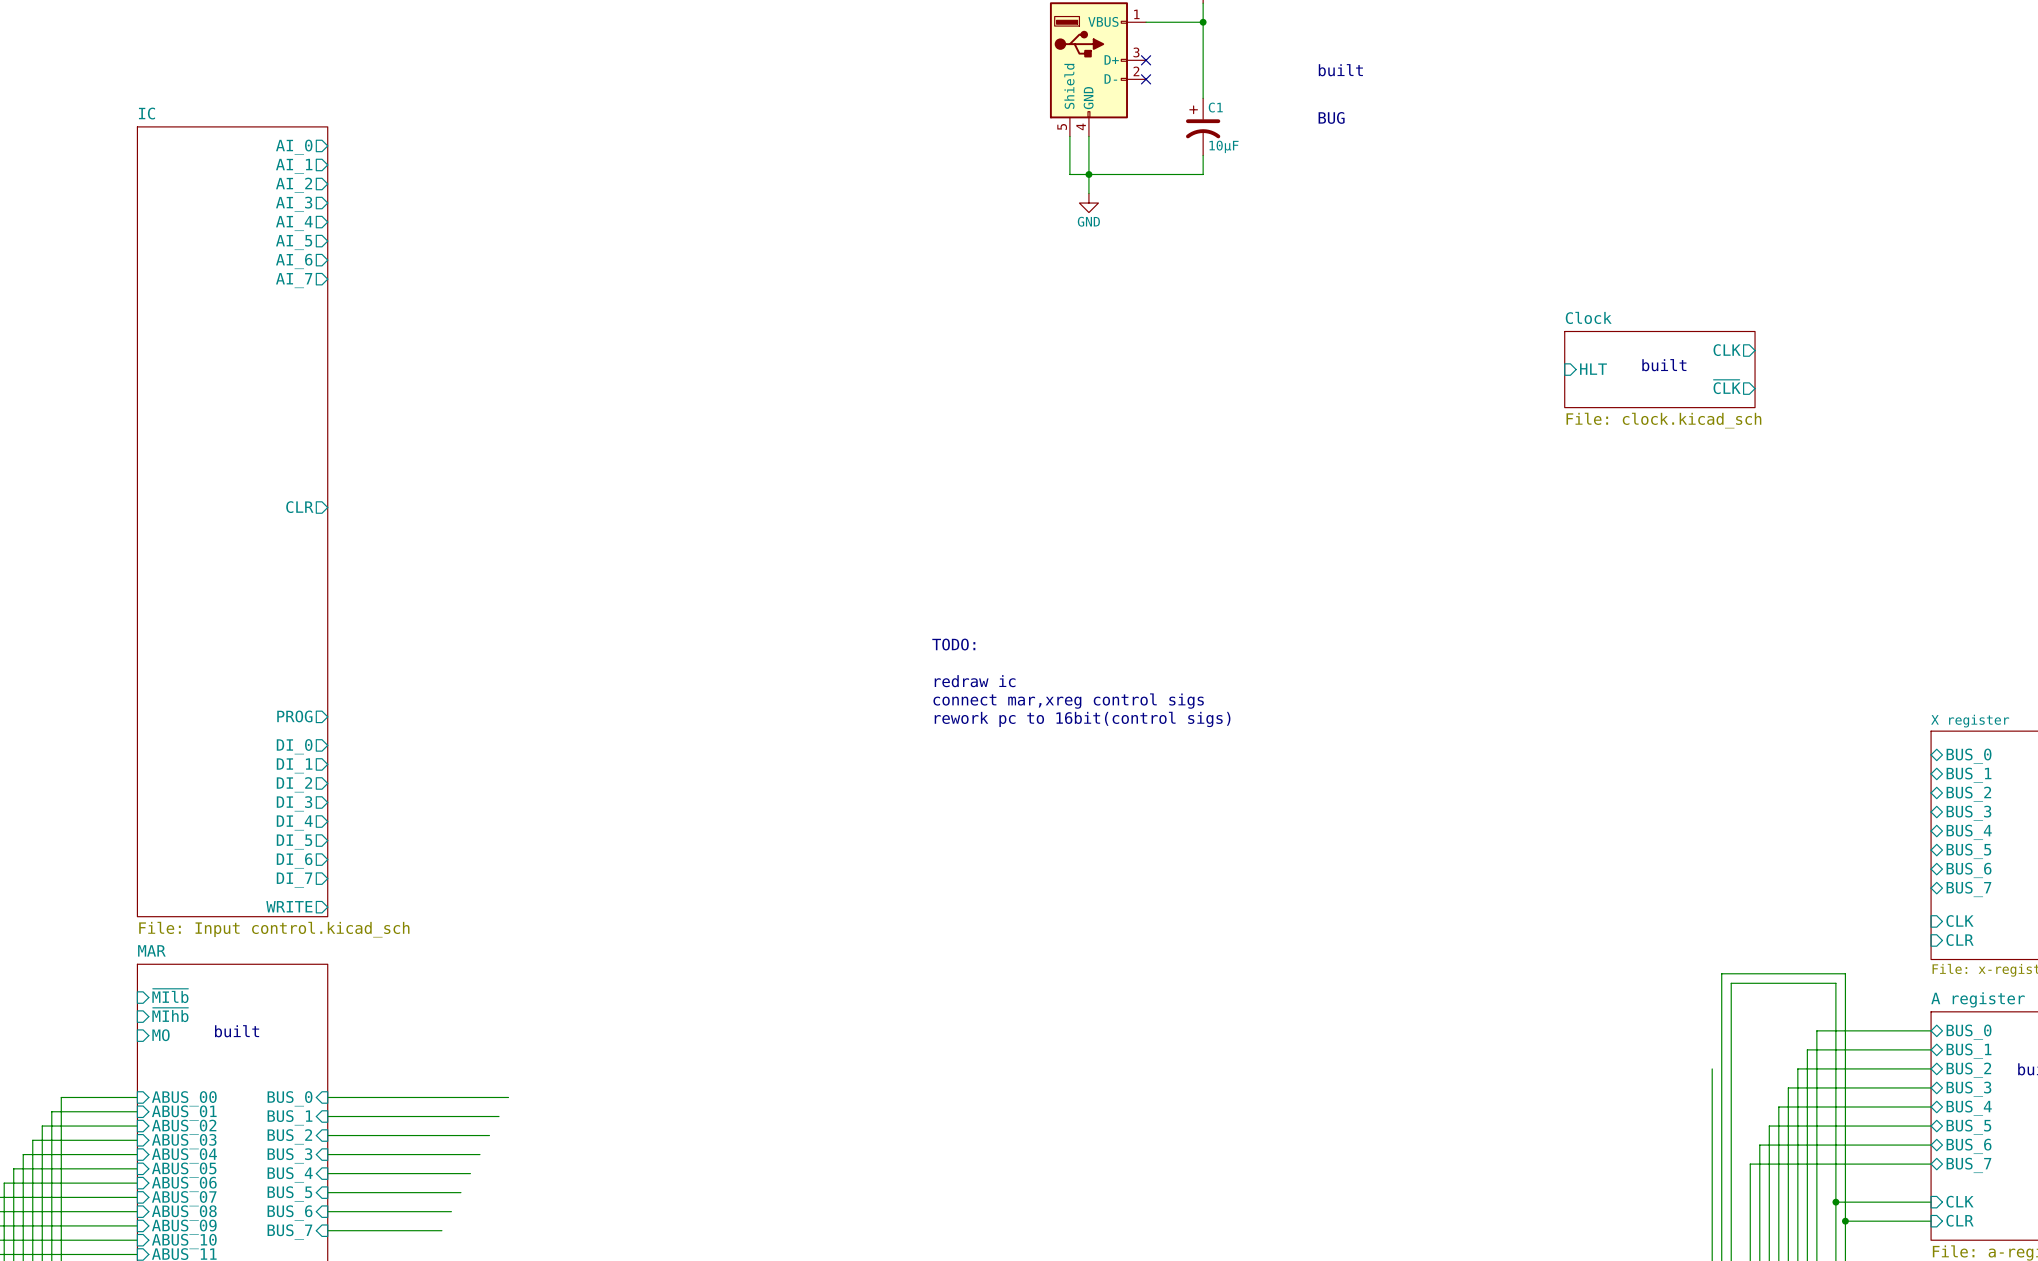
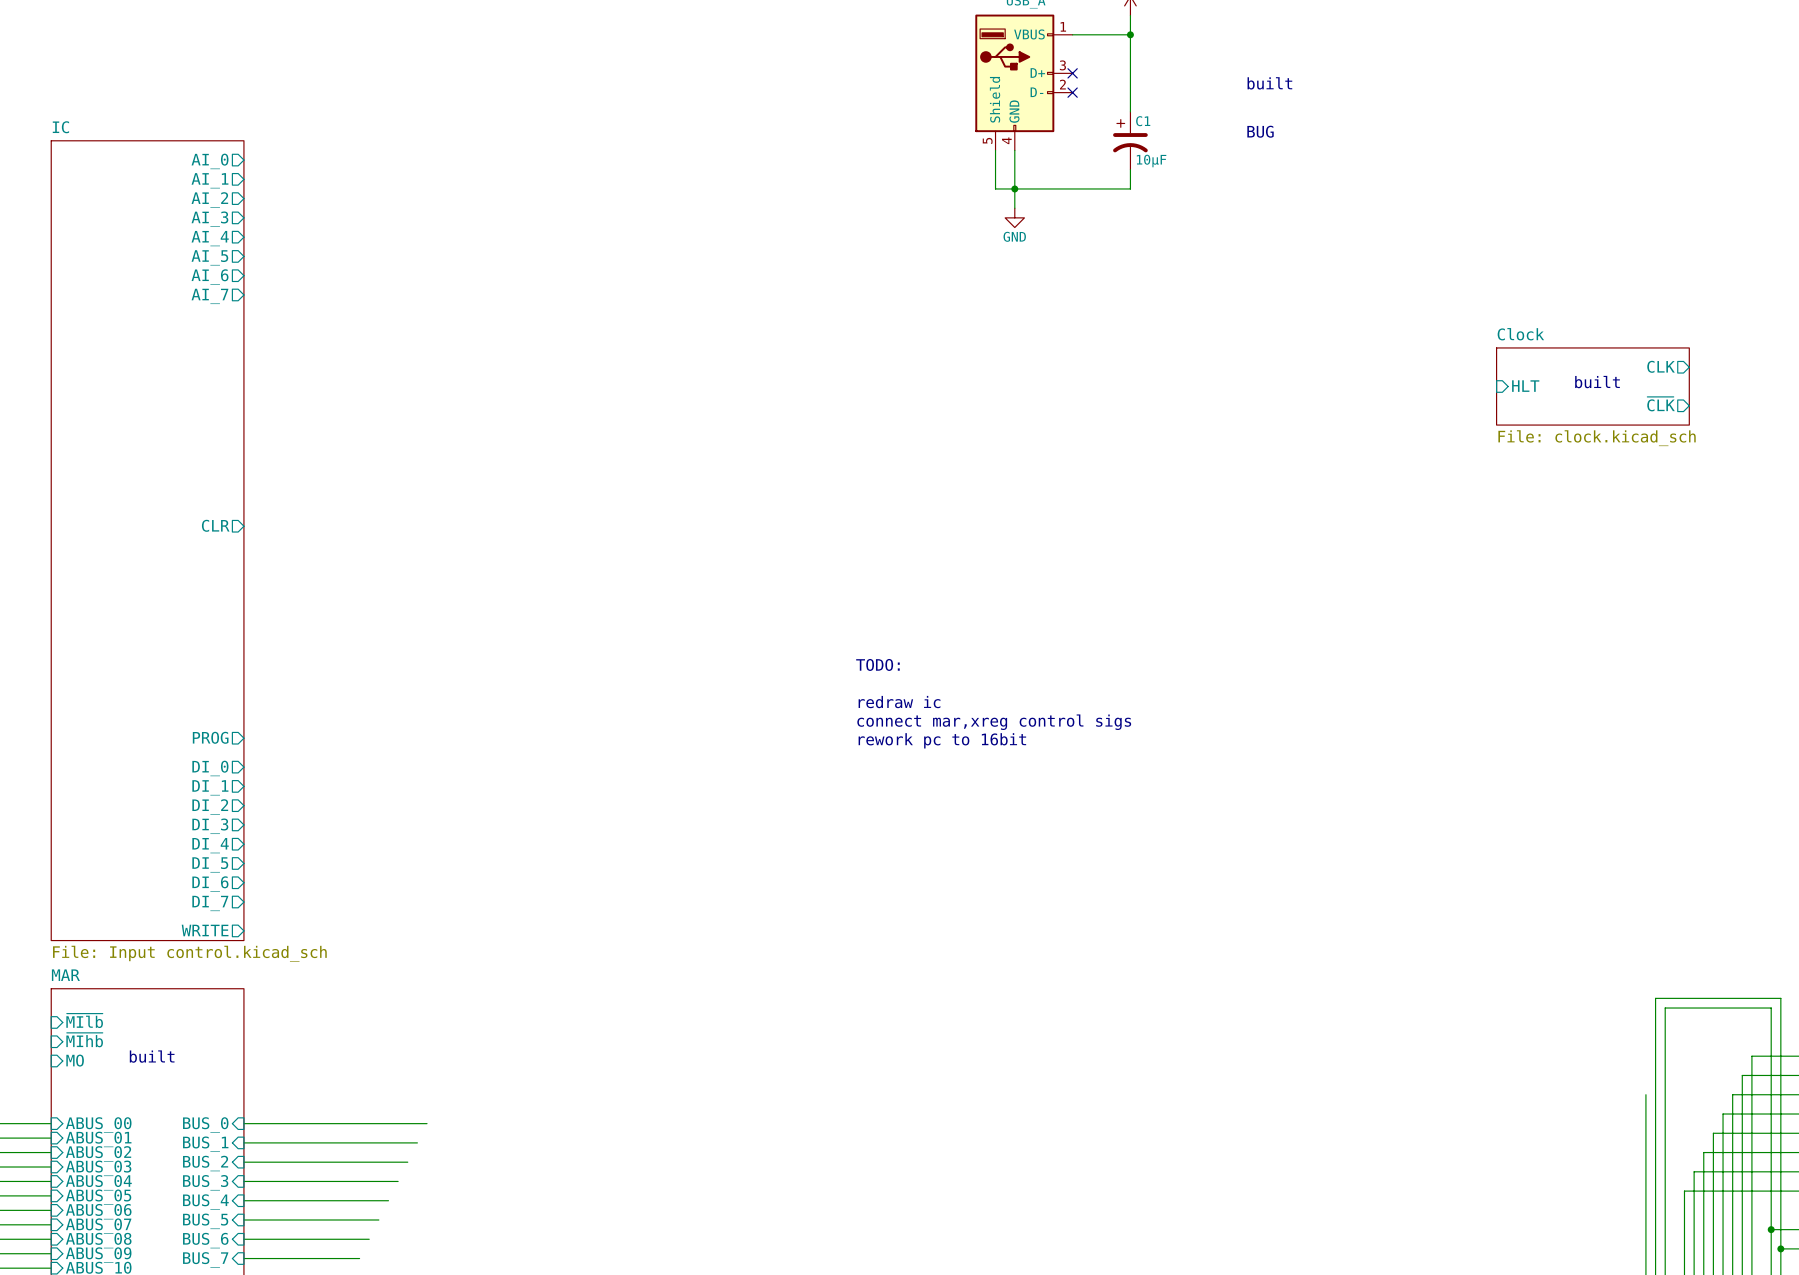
text: rework pc to 16bit(control sigs) (1082, 719) -> rework pc to 16bit (942, 740)

